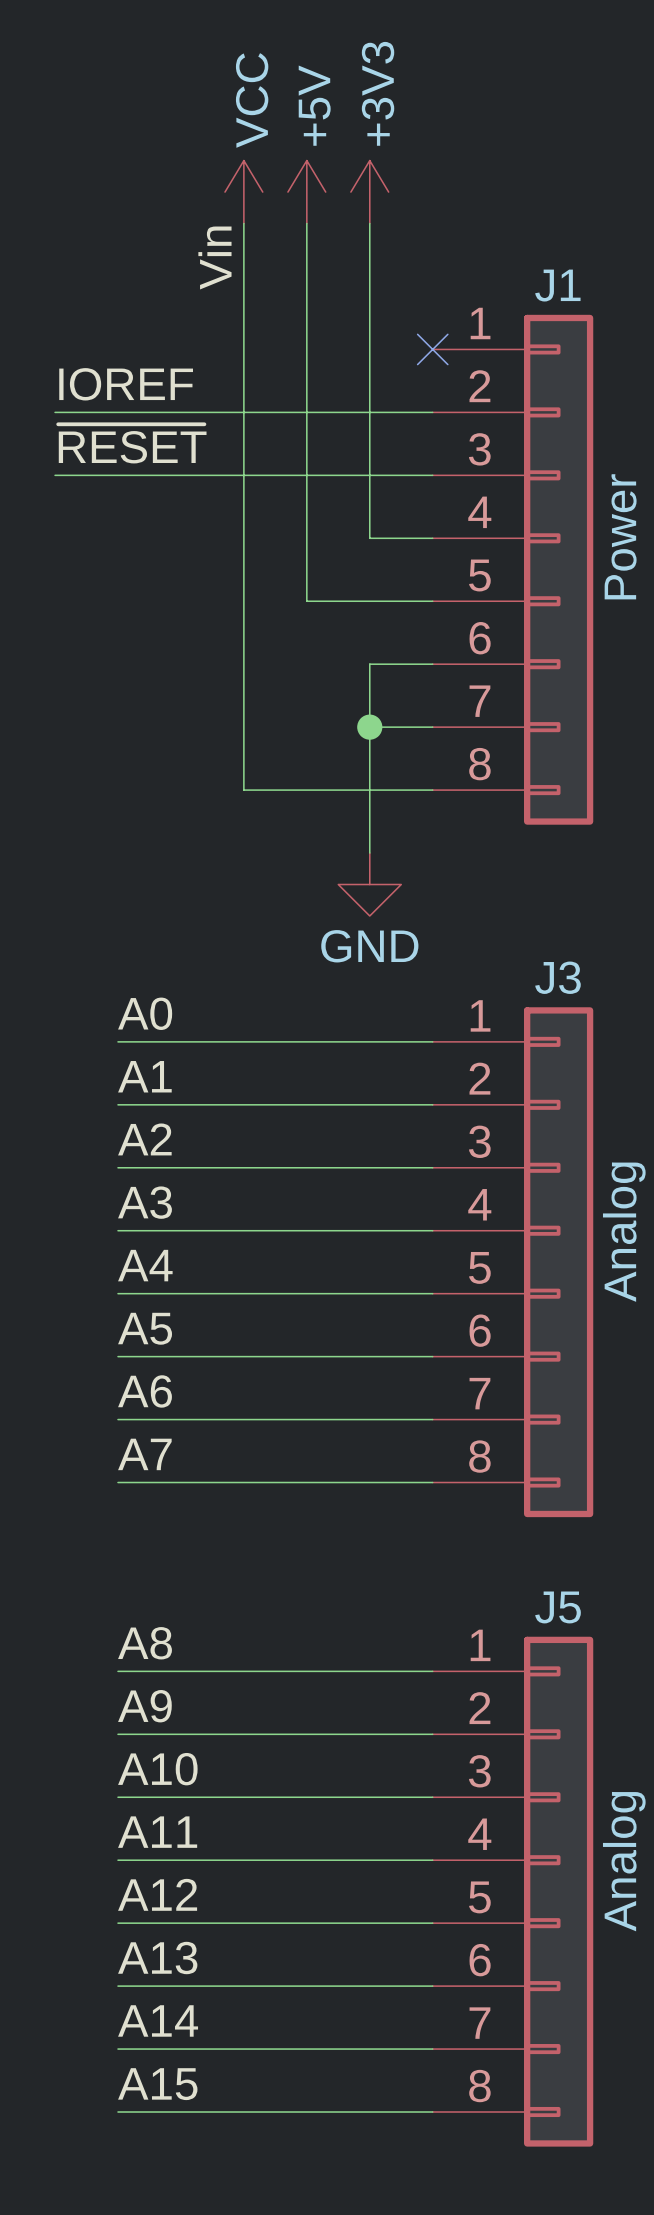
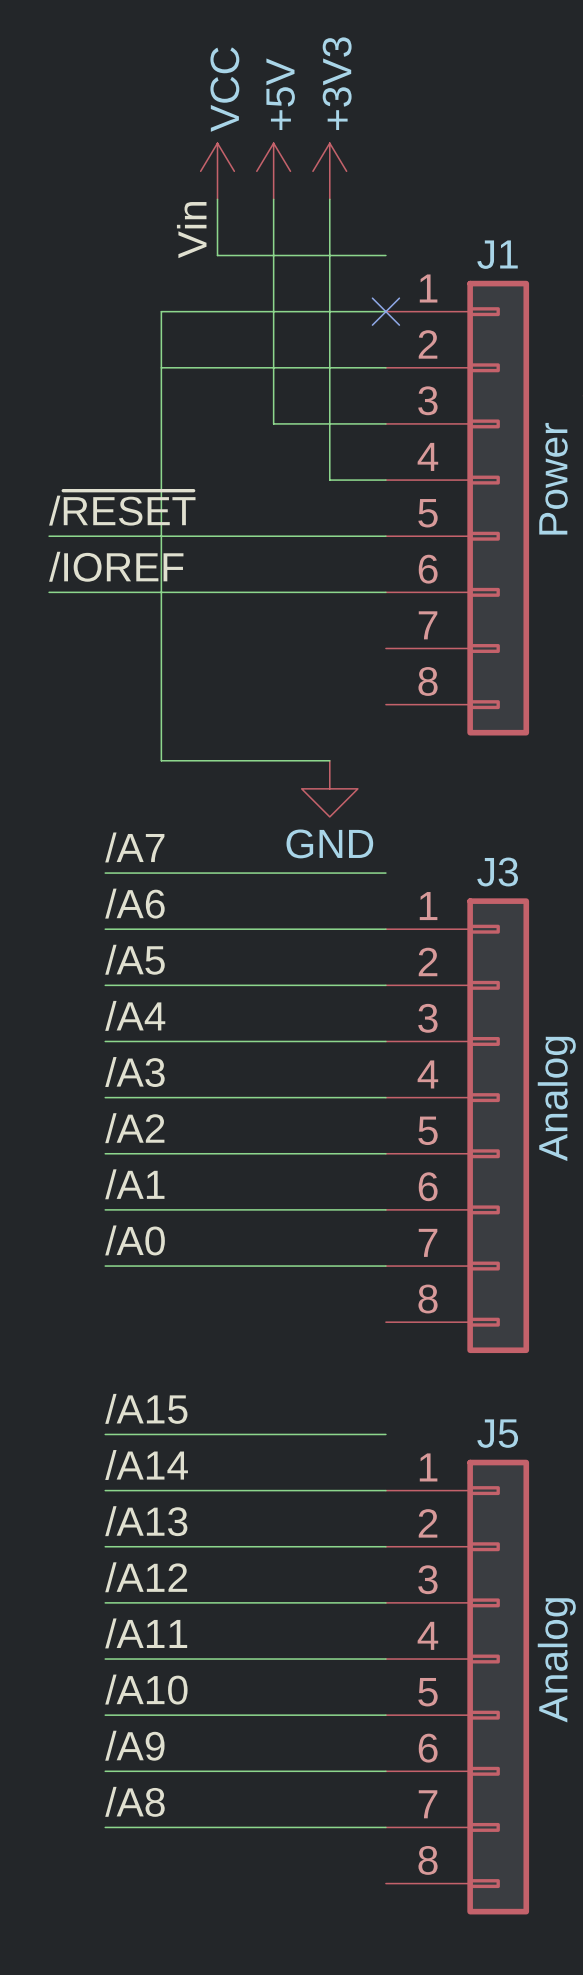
wire: (243, 286) (243, 790) (432, 790) -> (217, 255) (385, 255)
label: IOREF (126, 384) -> none
wire: (55, 412) (180, 412) -> none
label: ~{RESET} (132, 443) -> none
wire: (55, 475) (306, 475) (306, 601) -> (49, 536) (273, 536)
label: none -> /~{RESET} (122, 508)
label: none -> /IOREF (116, 566)
wire: none -> (49, 592) (329, 592)
wire: (369, 664) (369, 853) -> (385, 311) (161, 311) (161, 760) (329, 760)
wire: (369, 727) (432, 727) -> none
junction: (369, 727) -> none
label: none -> /A7 (134, 847)
label: A0 (145, 1013) -> /A6 (134, 903)
label: A1 (144, 1076) -> /A5 (134, 959)
label: A2 (144, 1139) -> /A4 (135, 1015)
label: A3 (145, 1202) -> /A3 (134, 1072)
label: A4 (145, 1265) -> /A2 (134, 1128)
label: A5 (145, 1328) -> /A1 (134, 1184)
label: A6 (145, 1391) -> /A0 (135, 1240)
label: A7 (144, 1454) -> none
wire: (117, 1482) (432, 1482) -> (105, 873) (385, 873)
label: none -> /A15 (146, 1408)
label: A8 (145, 1643) -> /A14 (146, 1465)
label: A9 (144, 1706) -> /A13 (146, 1521)
label: A10 (157, 1769) -> /A12 (146, 1577)
label: A11 (157, 1832) -> /A11 (146, 1633)
label: A12 (157, 1894) -> /A10 (146, 1689)
label: A13 (157, 1958) -> /A9 (134, 1745)
label: A14 (158, 2020) -> /A8 (134, 1801)
label: A15 (157, 2084) -> none
wire: (117, 2112) (432, 2112) -> (105, 1434) (385, 1434)

